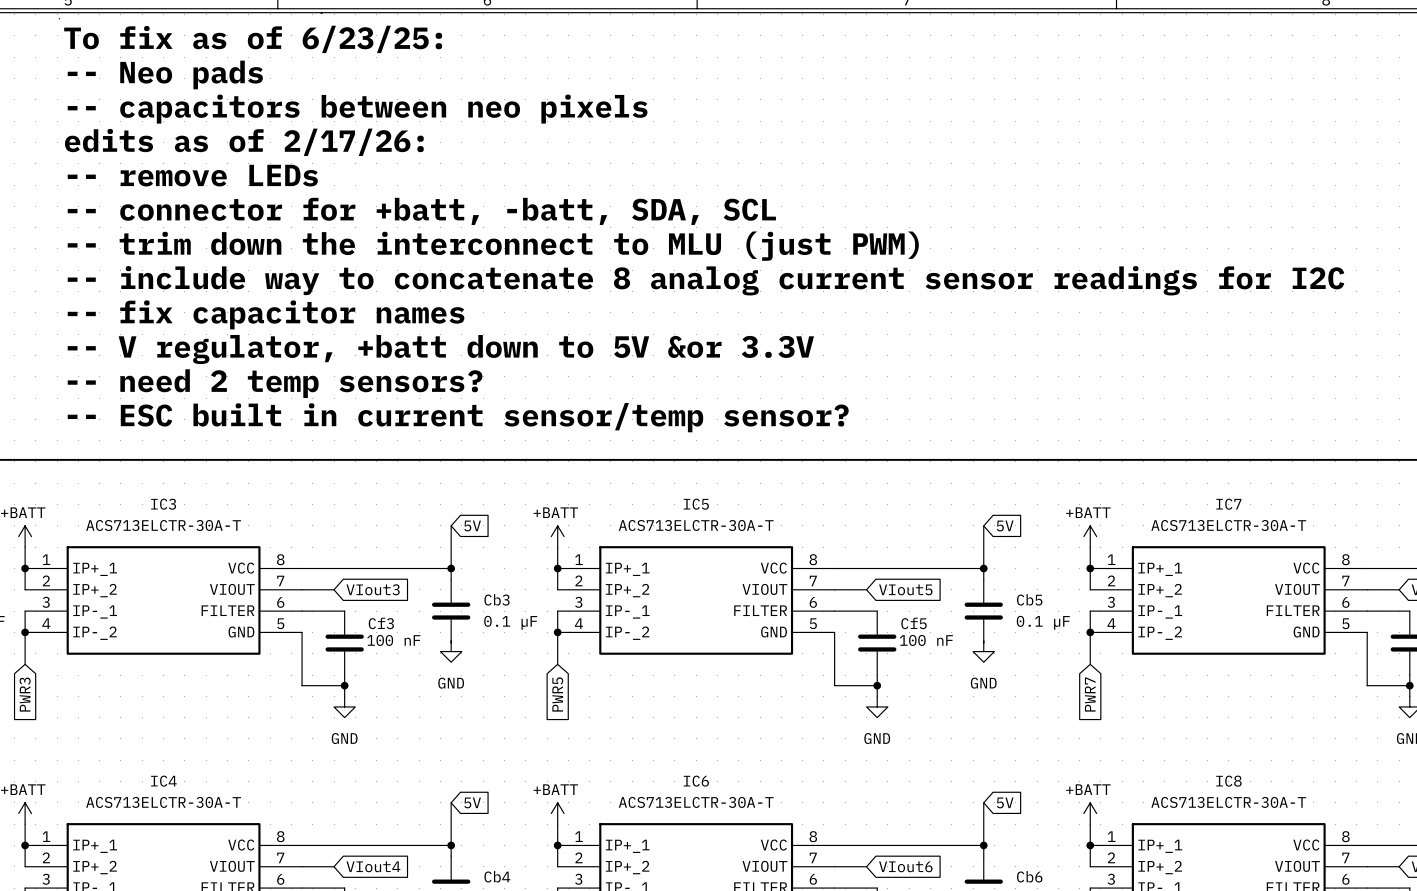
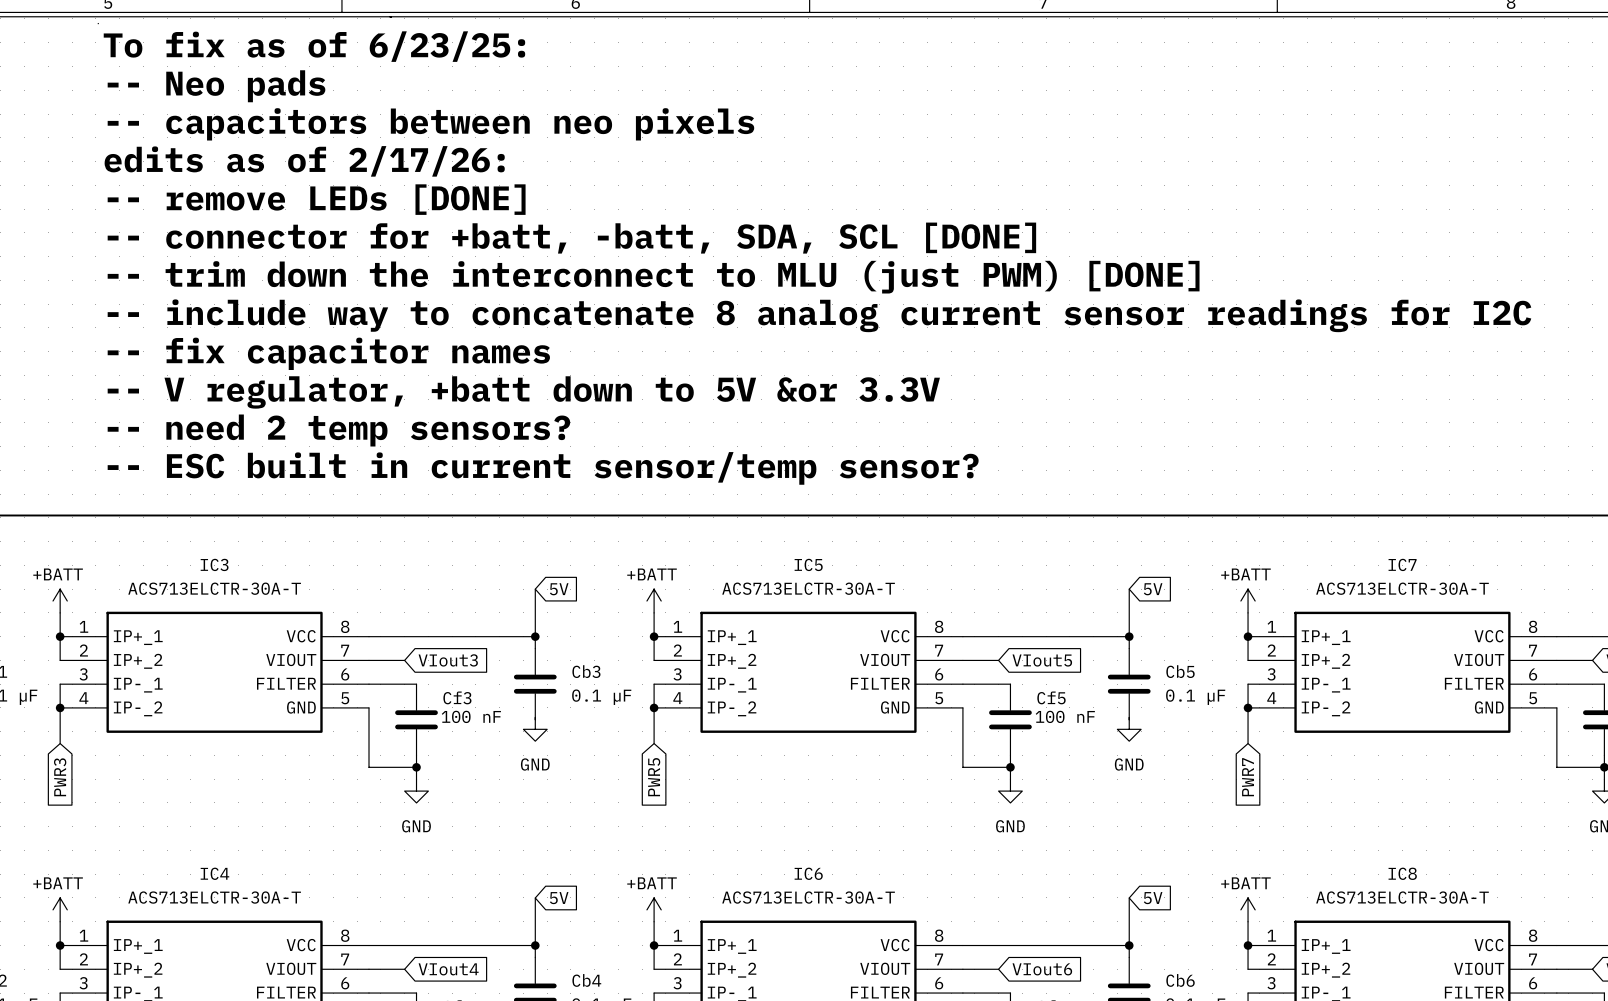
text: -- remove LEDs (192, 175) -> -- remove LEDs [DONE] (316, 199)
text: -- connector for +batt, -batt, SDA, SCL (421, 211) -> -- connector for +batt, -batt, SDA, SCL [DONE] (571, 238)
text: -- trim down the interconnect to MLU (just PWM) (493, 246) -> -- trim down the interconnect to MLU (just PWM) [DONE] (653, 277)

